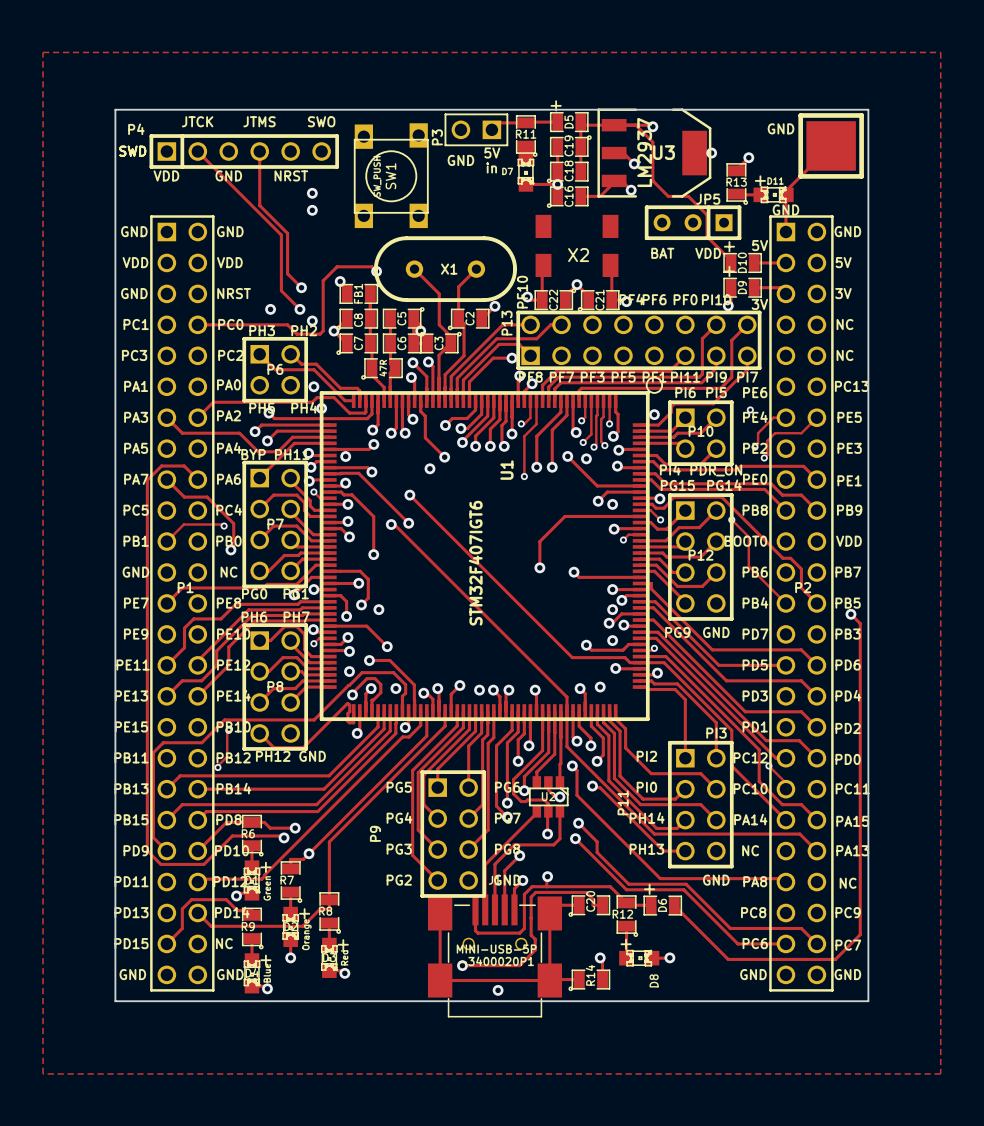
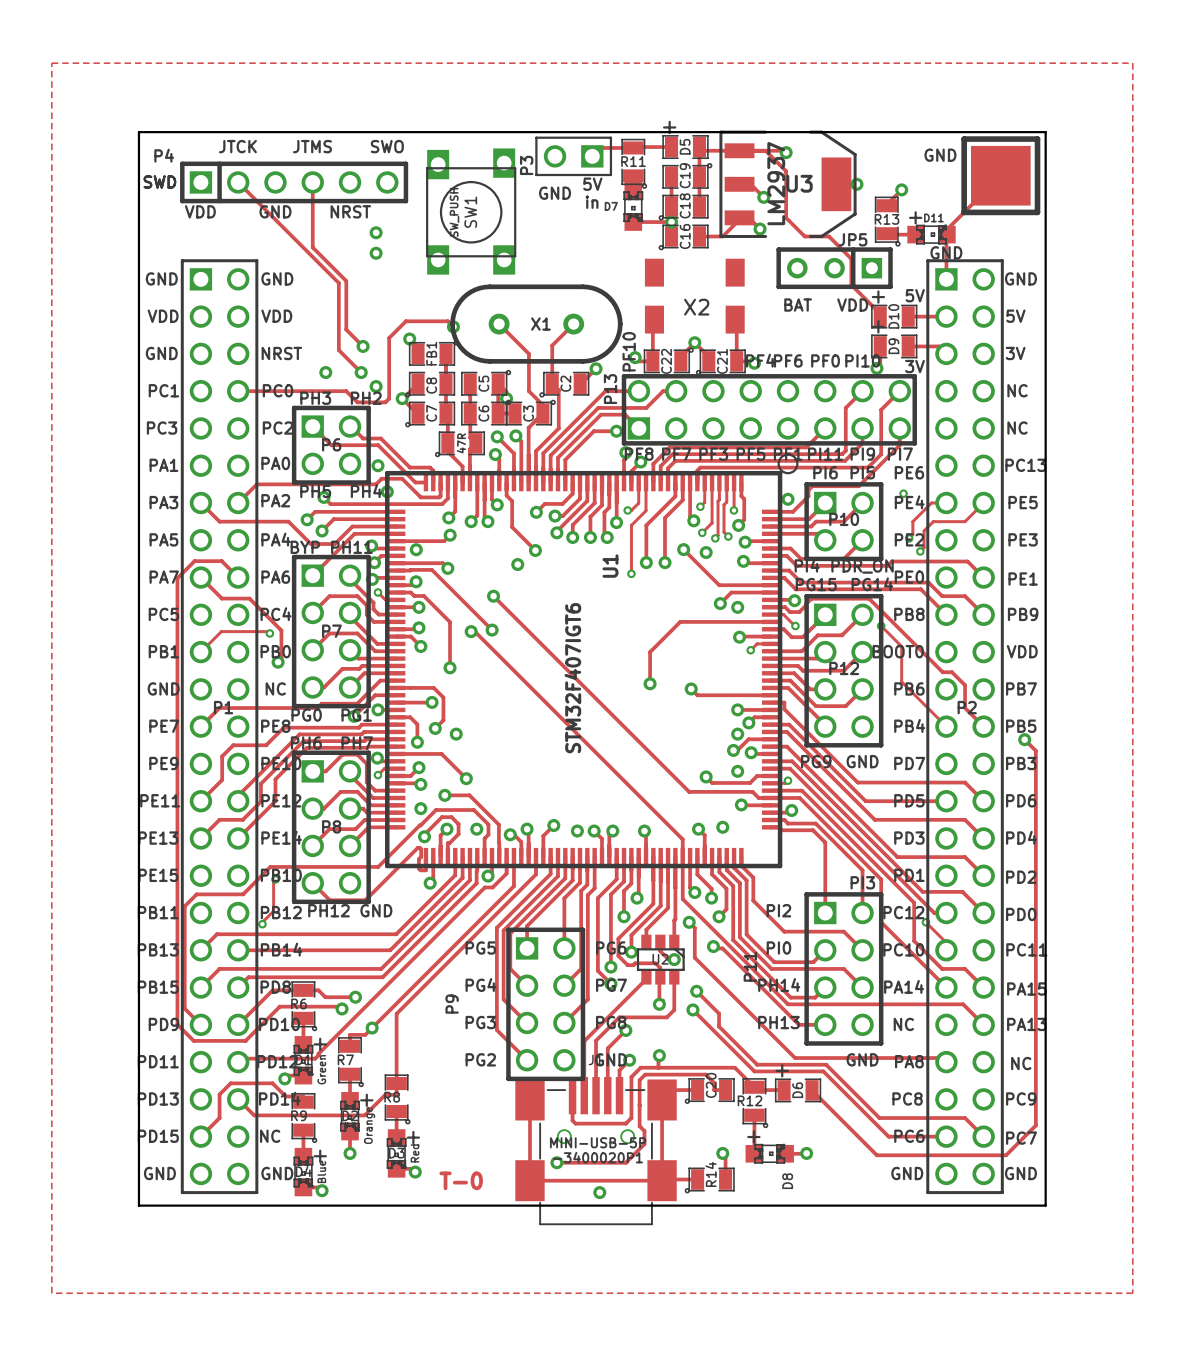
text: none -> T-0 (461, 1180)

